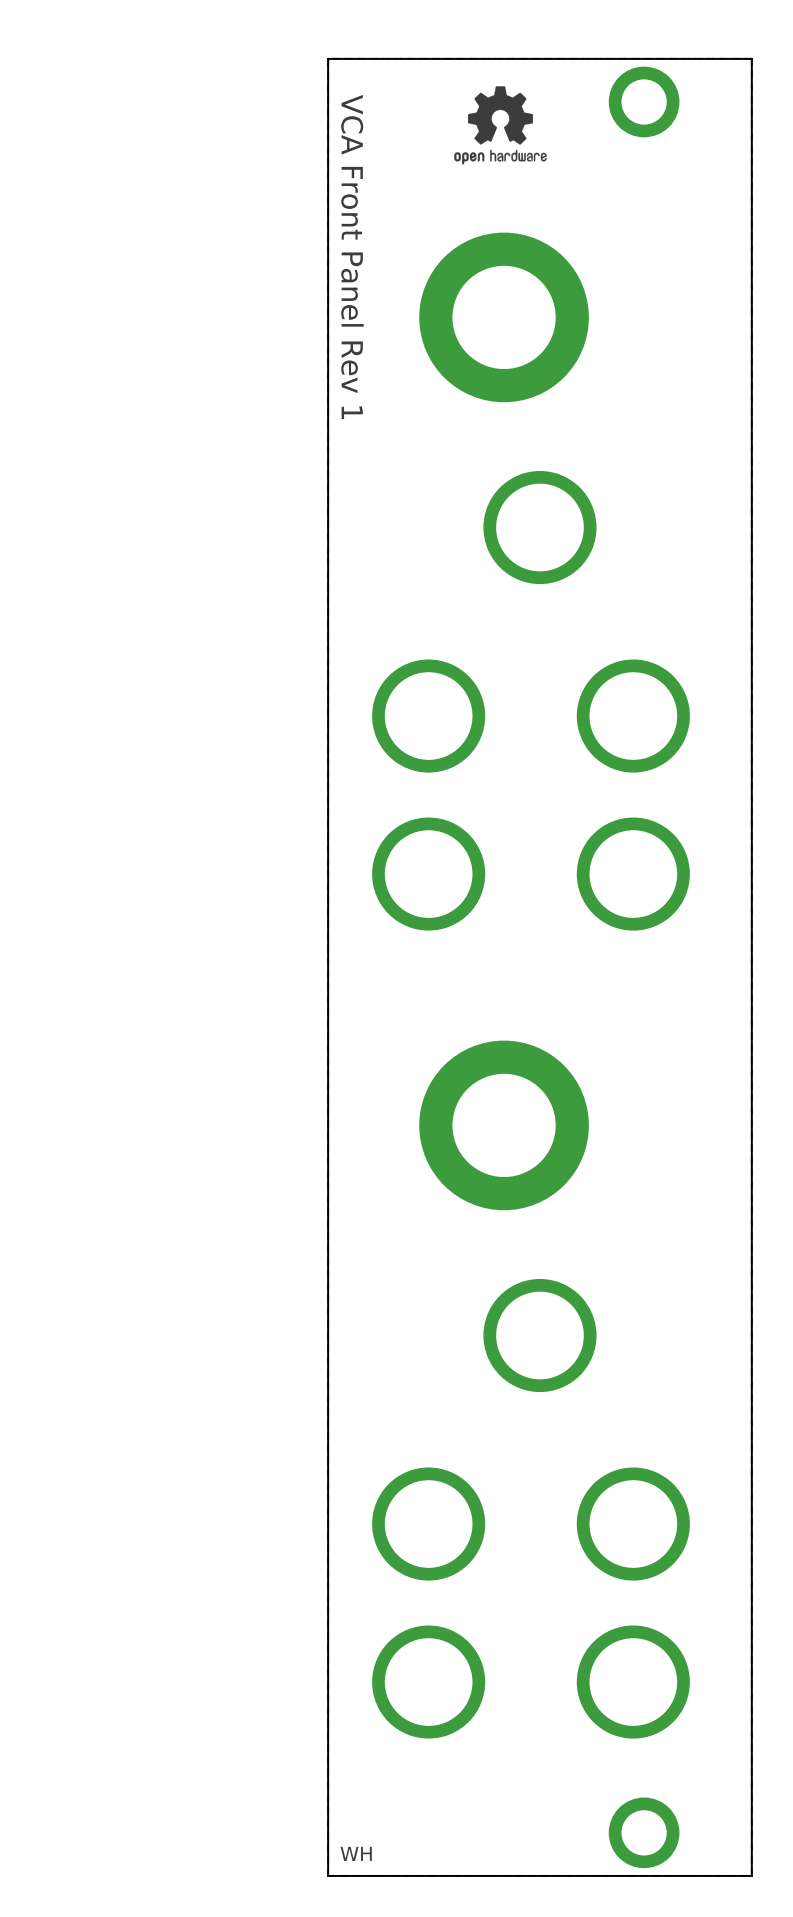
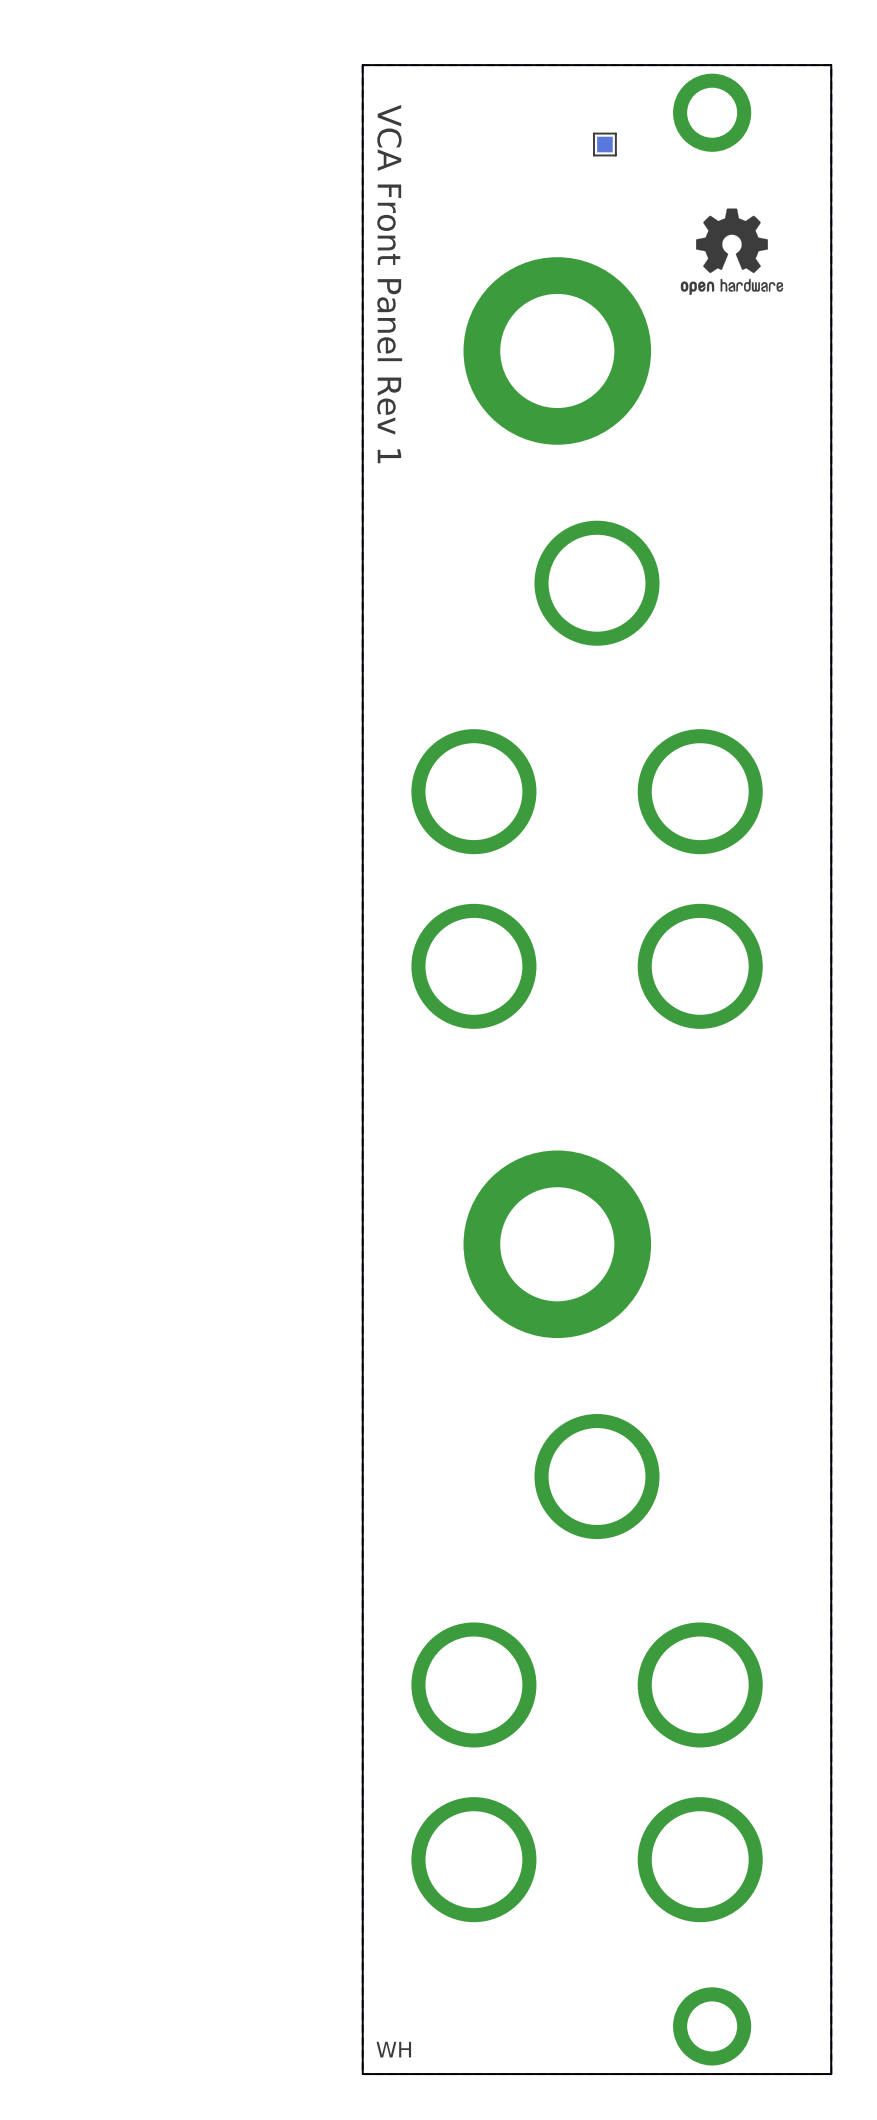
drawing position: (500, 125) -> (731, 251)
part: none -> (604, 144)

